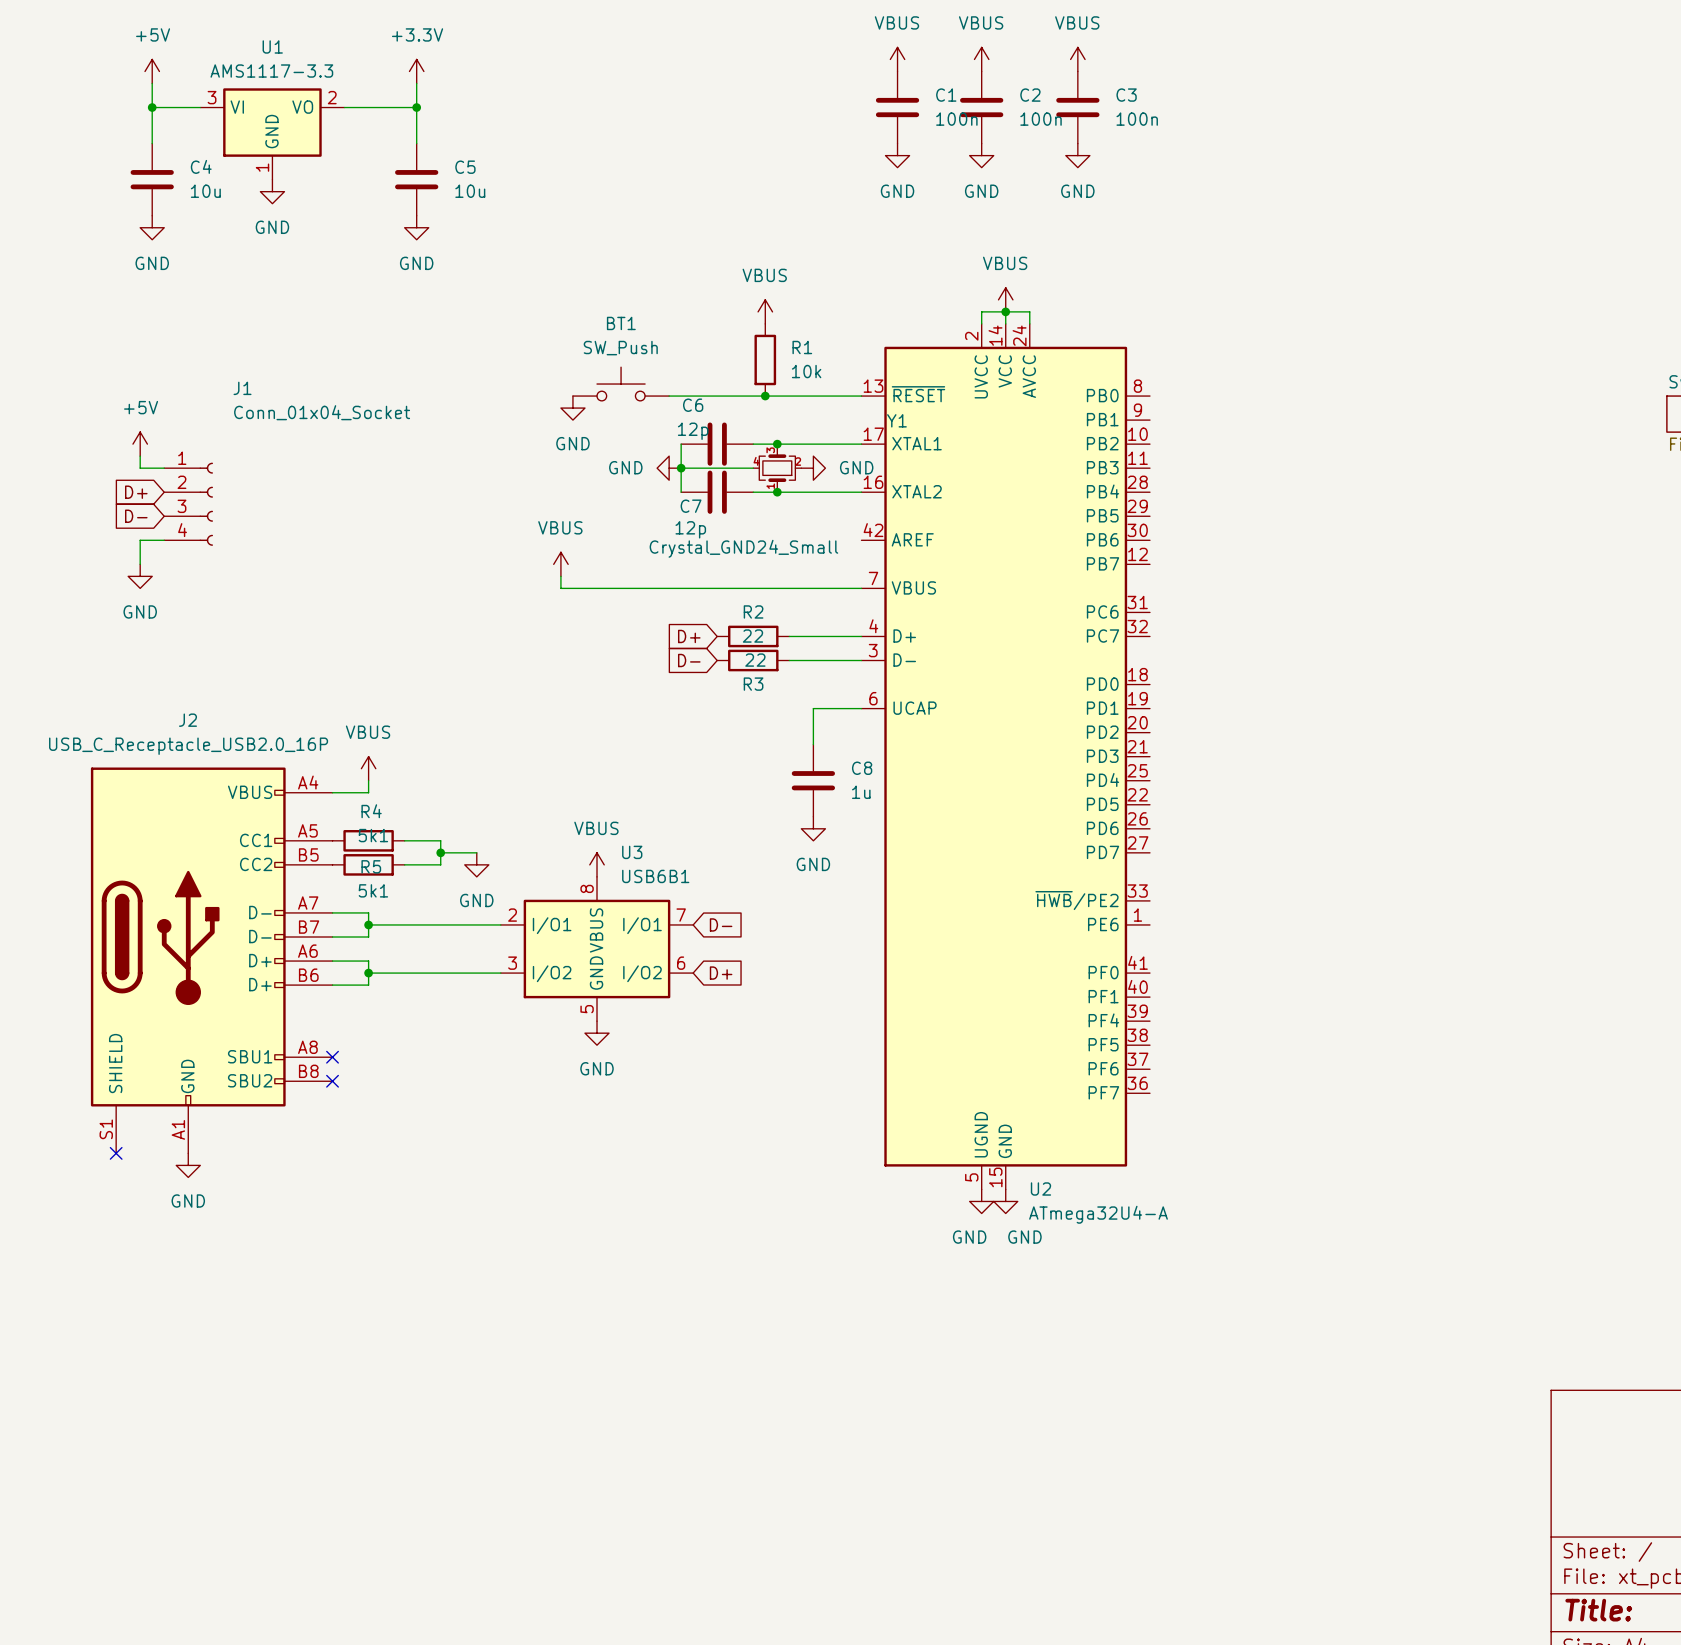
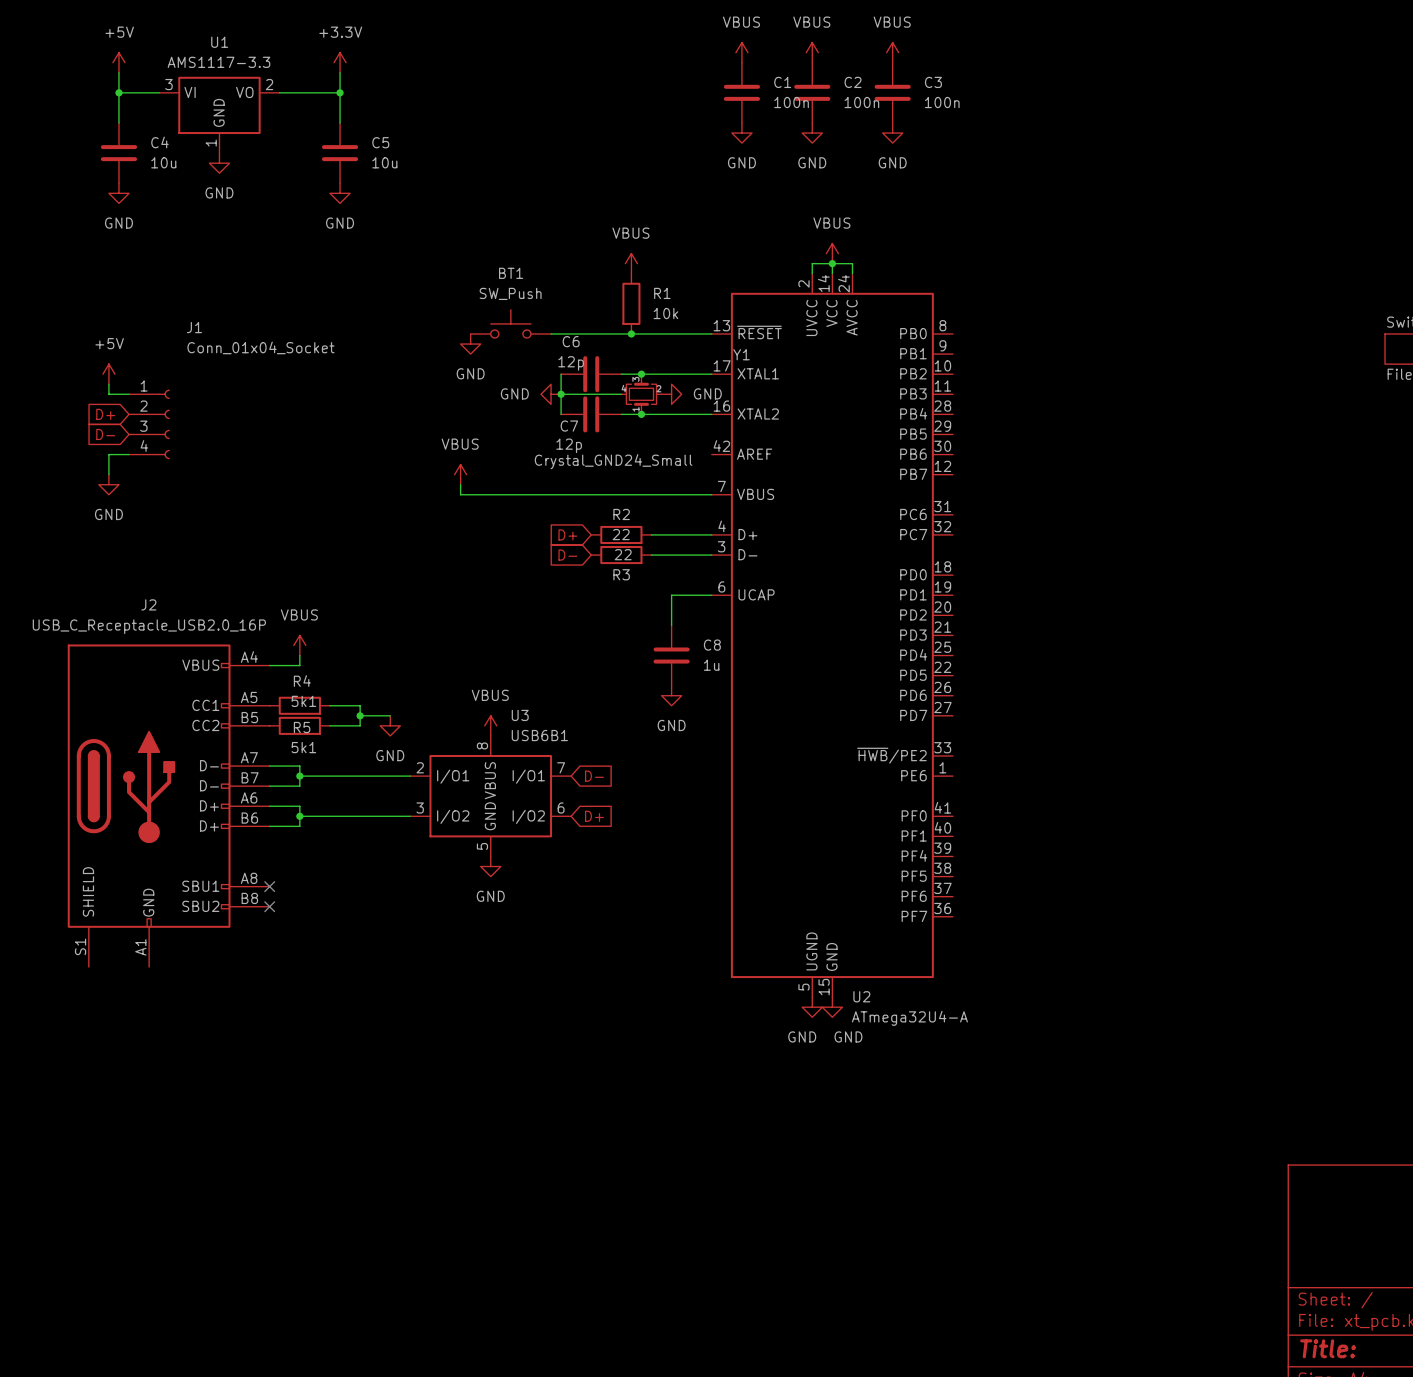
no-connect mark: (116, 1153) -> none
power symbol: GND (188, 1165) -> none

